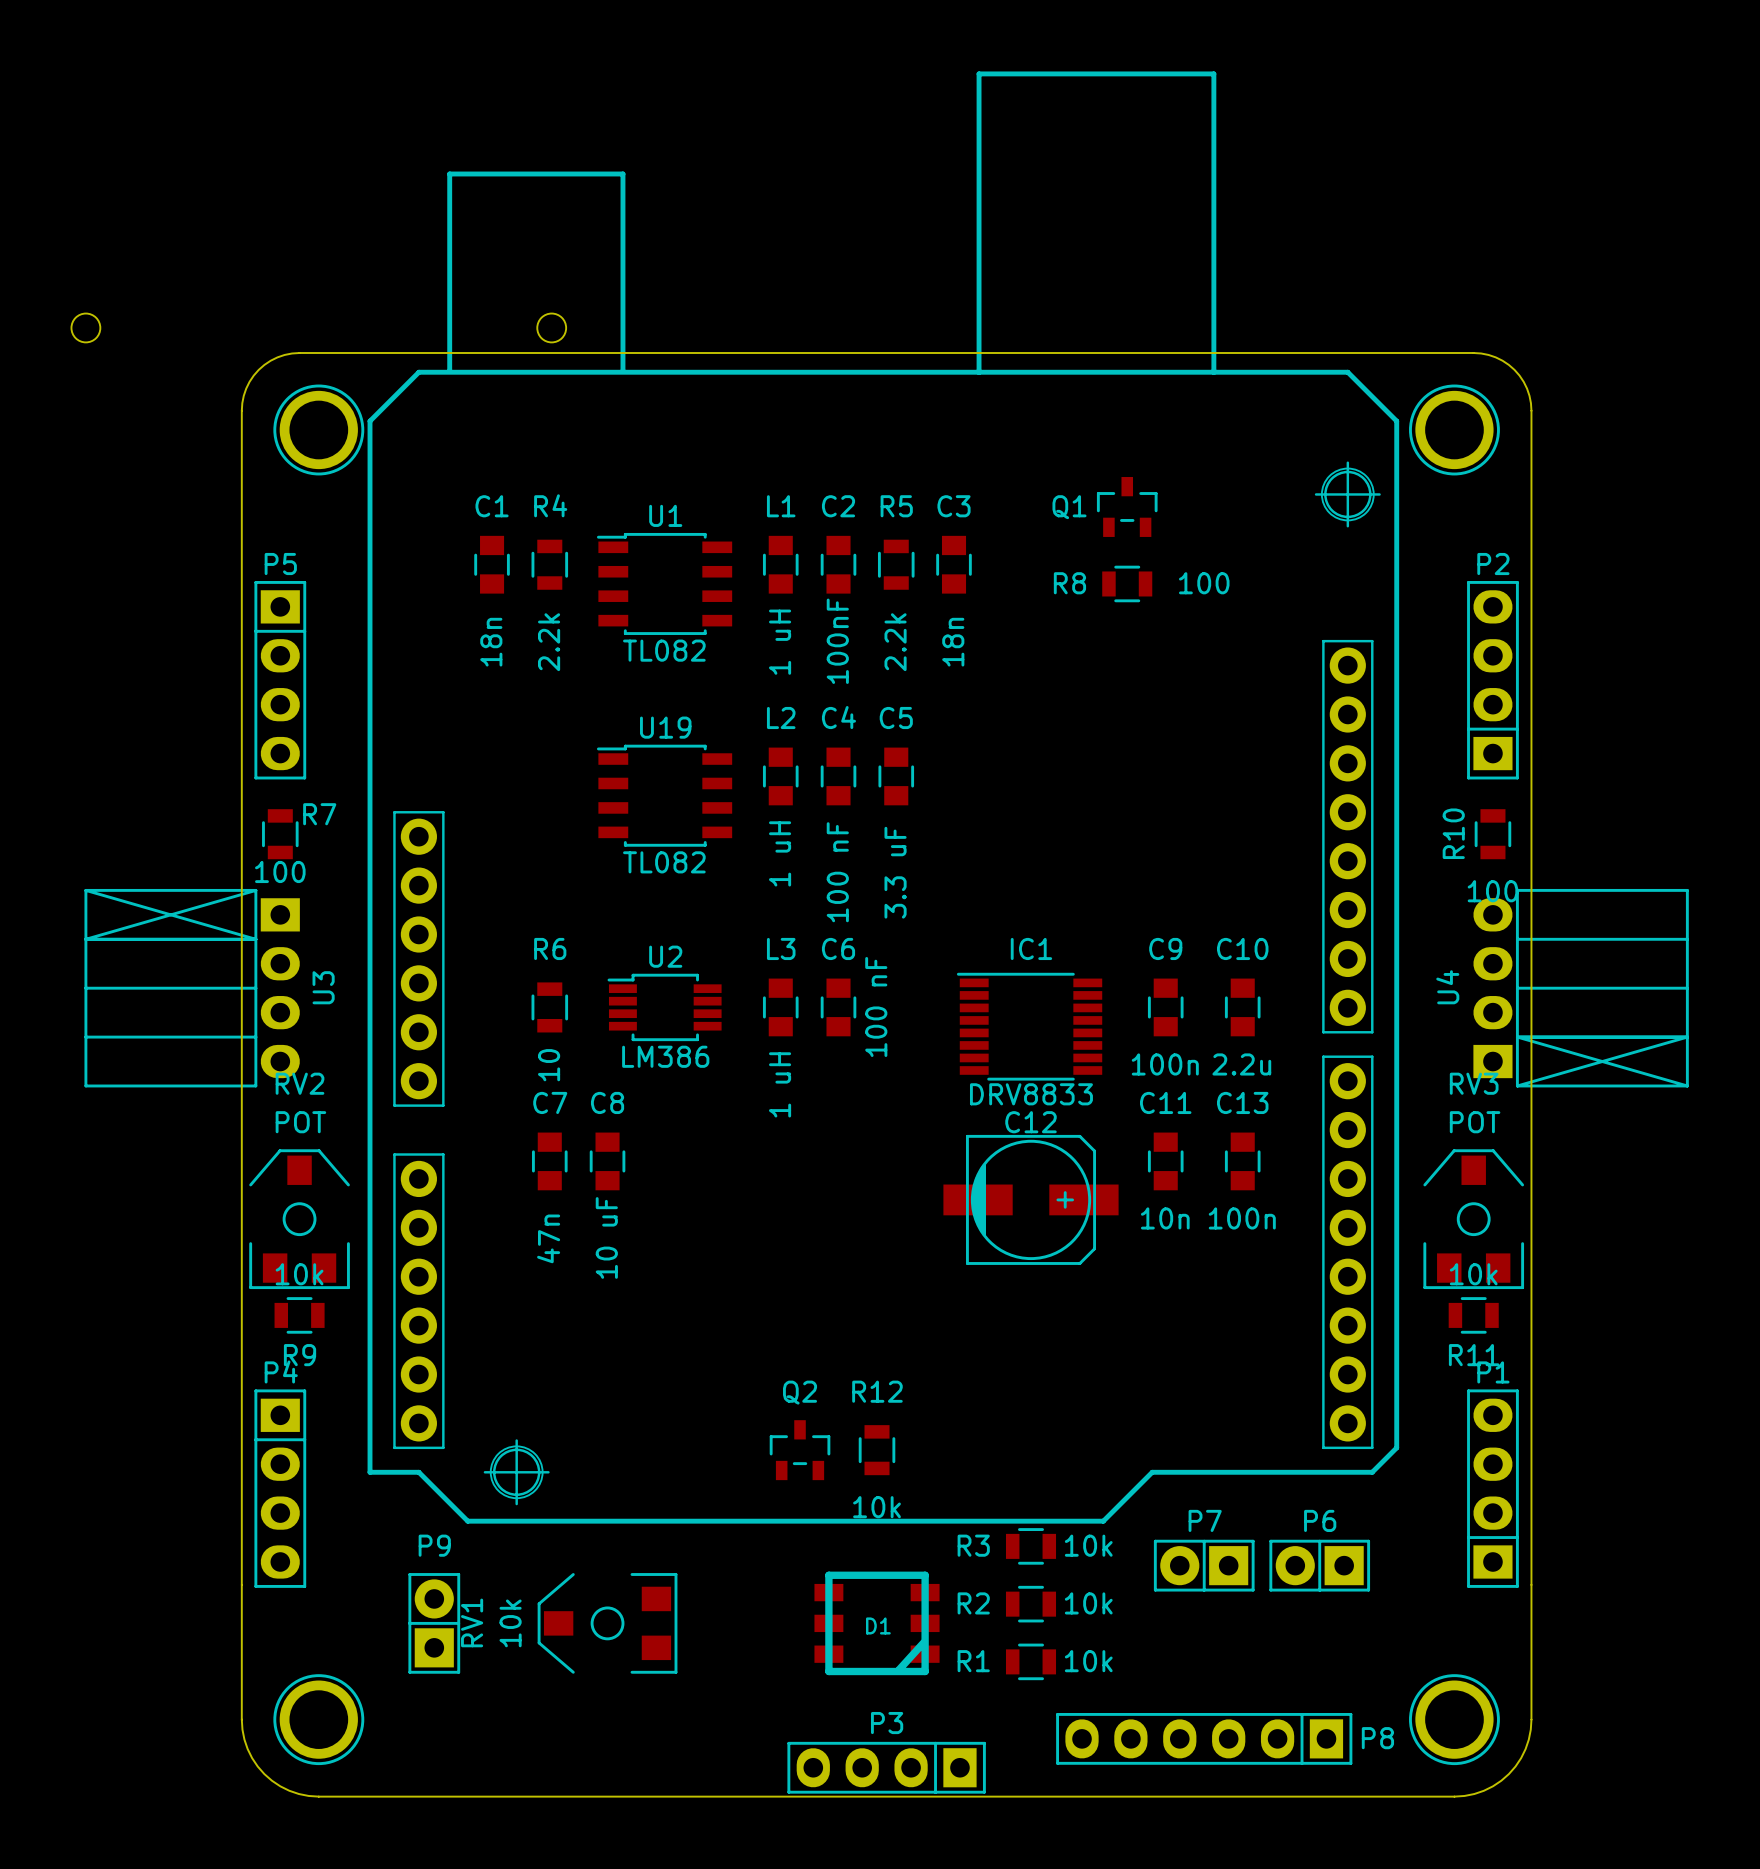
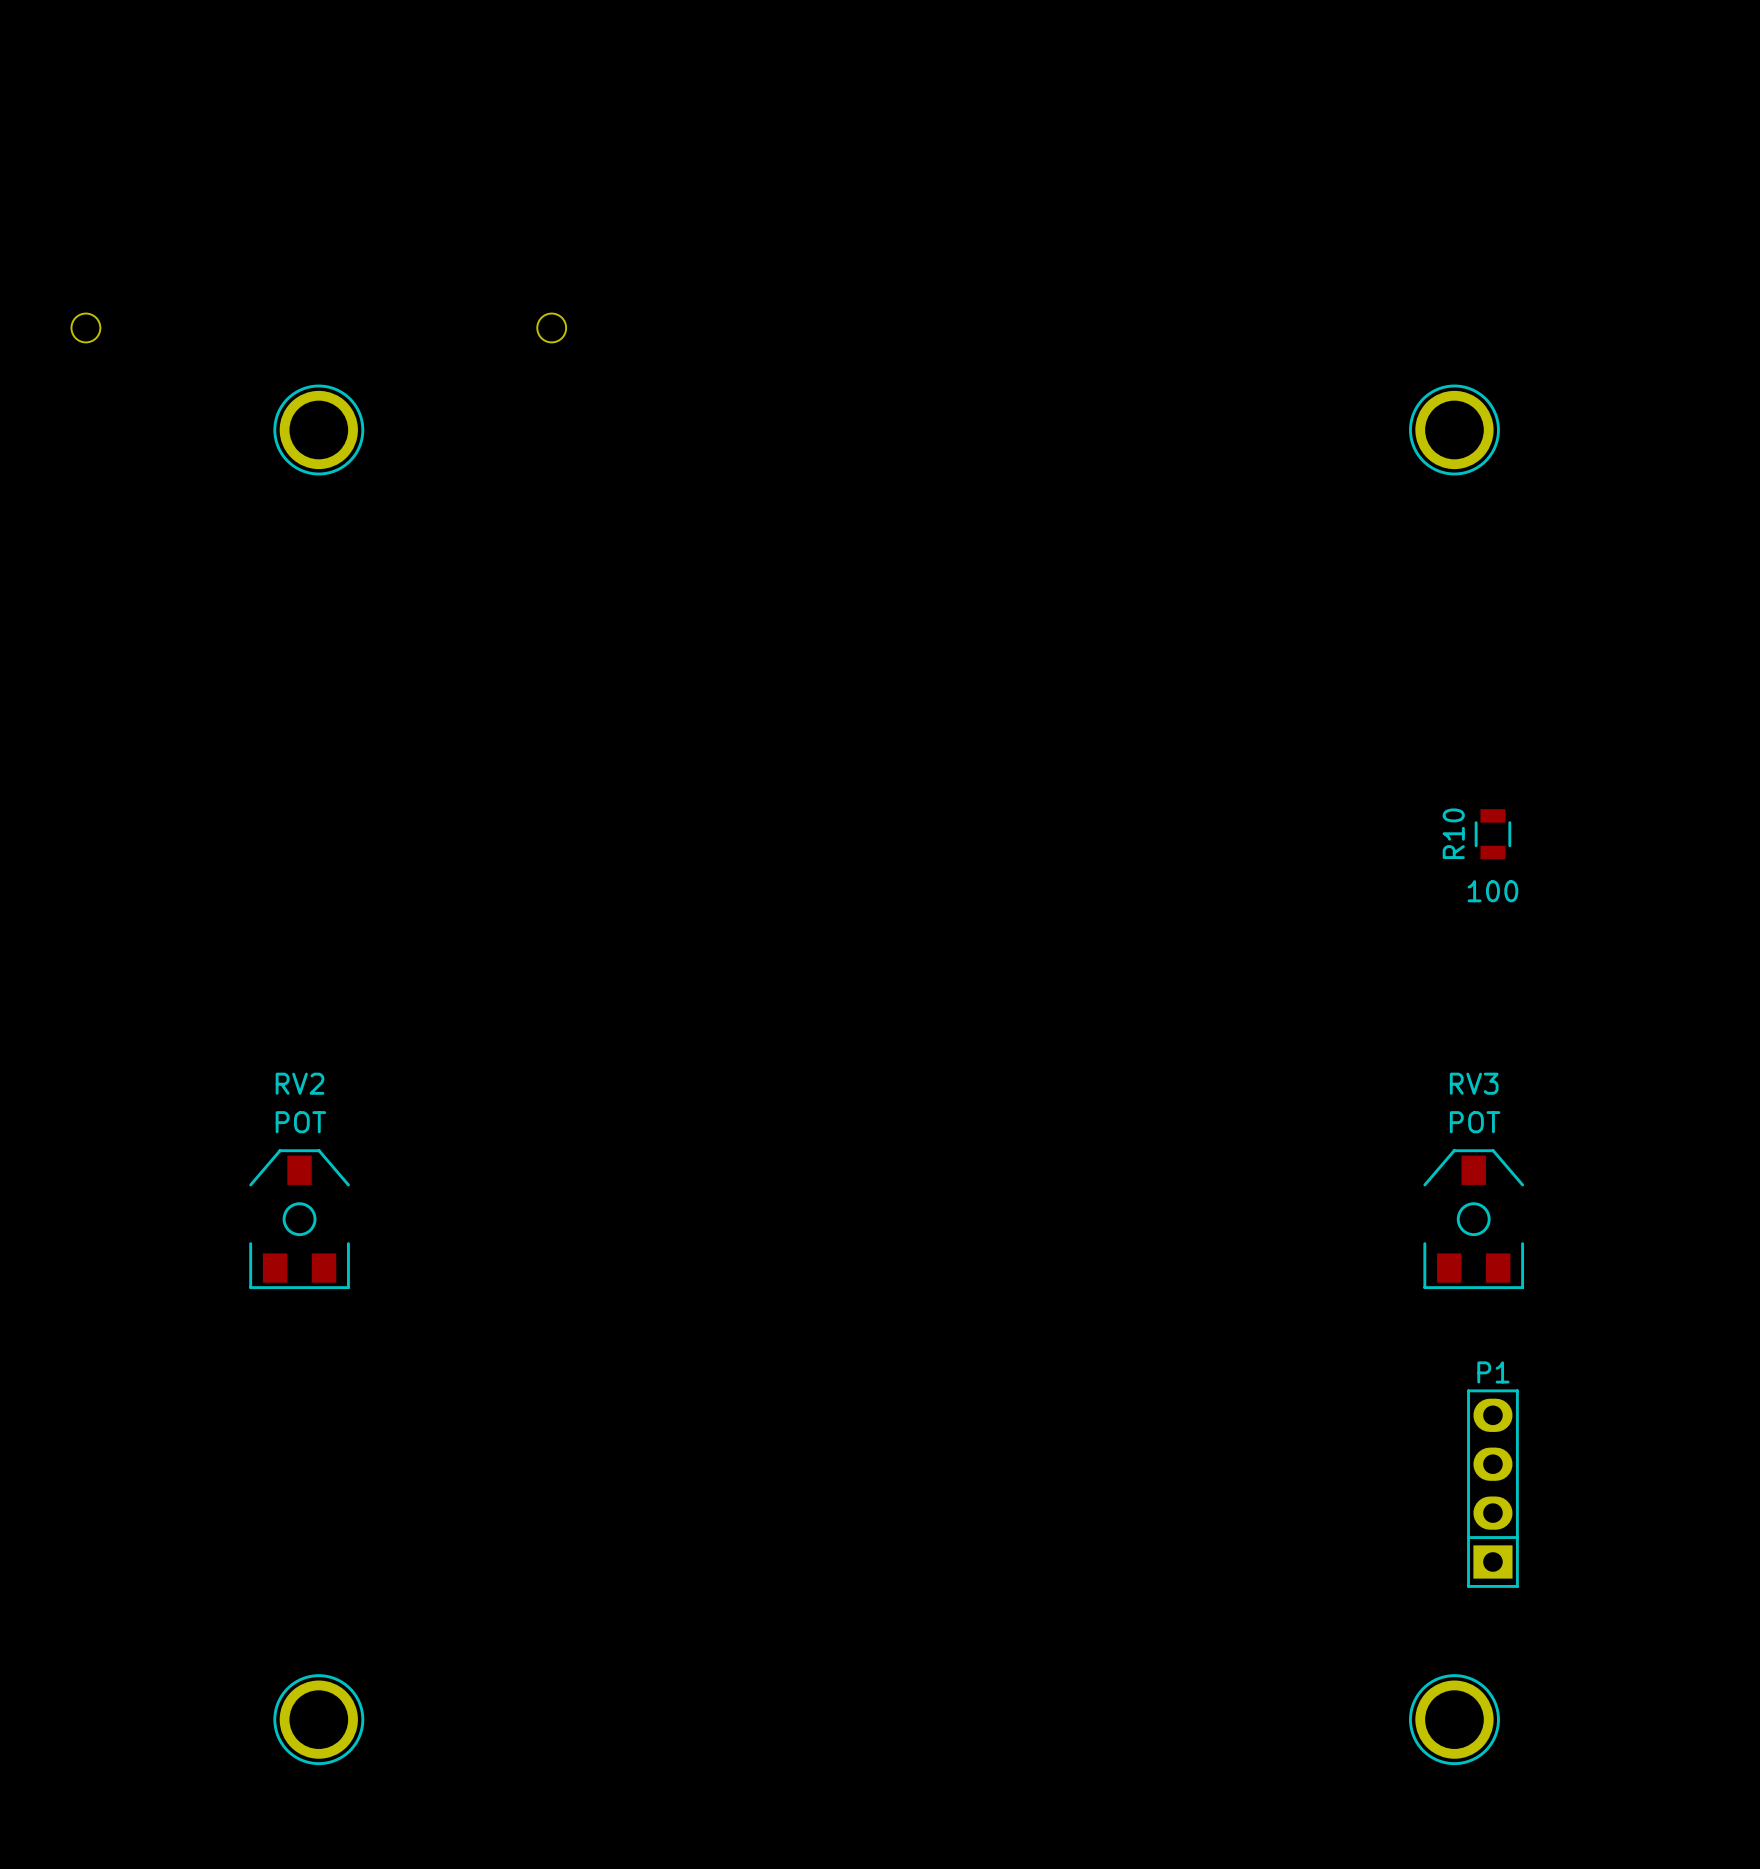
board edge: (299, 352) (1473, 352) (1488, 354) (1502, 360) (1519, 375) (1527, 388) (1531, 410) (1531, 1719) (1528, 1739) (1521, 1758) (1501, 1780) (1474, 1794) (1454, 1796) (318, 1796) (289, 1790) (271, 1780) (257, 1766) (247, 1749) (241, 1719) (241, 410) (246, 388) (258, 369) (277, 357) (299, 352) -> none
Q1: (1127, 506) -> none
C1: 18n (492, 564) -> none
R4: 2.2k (549, 564) -> none
L1: 1 uH (780, 564) -> none
C2: 100nF (838, 564) -> none
R5: 2.2k (896, 564) -> none
C3: 18n (954, 564) -> none
U1: TL082 (664, 583) -> none
R8: 100 (1127, 583) -> none
P5: (280, 680) -> none
P2: (1492, 680) -> none
L2: 1 uH (780, 776) -> none
C4: 100 nF (838, 776) -> none
C5: 3.3 uF (896, 776) -> none
U19: TL082 (664, 795) -> none
part: (883, 797) -> none
R7: 100 (280, 834) -> none
U3: (192, 988) -> none
U4: (1581, 988) -> none
R6: 10 (549, 1007) -> none
U2: LM386 (664, 1007) -> none
L3: 1 uH (780, 1007) -> none
C6: 100 nF (838, 1007) -> none
C9: 100n (1165, 1007) -> none
C10: 2.2u (1242, 1007) -> none
IC1: DRV8833 (1029, 1026) -> none
C7: 47n (549, 1161) -> none
C8: 10 uF (607, 1161) -> none
C11: 10n (1165, 1161) -> none
C13: 100n (1242, 1161) -> none
C12: (1031, 1199) -> none
R9: 10k (299, 1315) -> none
R11: 10k (1473, 1315) -> none
Q2: (800, 1450) -> none
R12: 10k (877, 1450) -> none
P4: (280, 1488) -> none
R3: 10k (1031, 1546) -> none
P7: (1204, 1565) -> none
P6: (1319, 1565) -> none
R2: 10k (1031, 1604) -> none
P9: (434, 1623) -> none
RV1: 10k (607, 1623) -> none
D1: (877, 1623) -> none
R1: 10k (1031, 1661) -> none
P8: (1204, 1738) -> none
P3: (886, 1767) -> none

